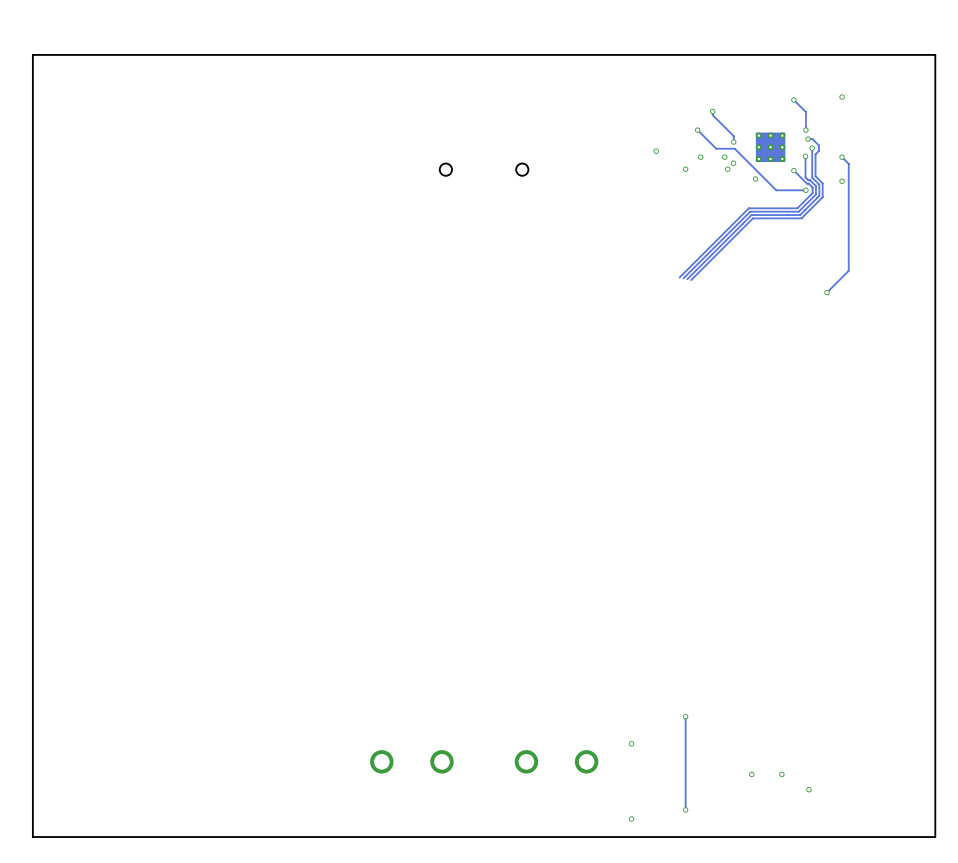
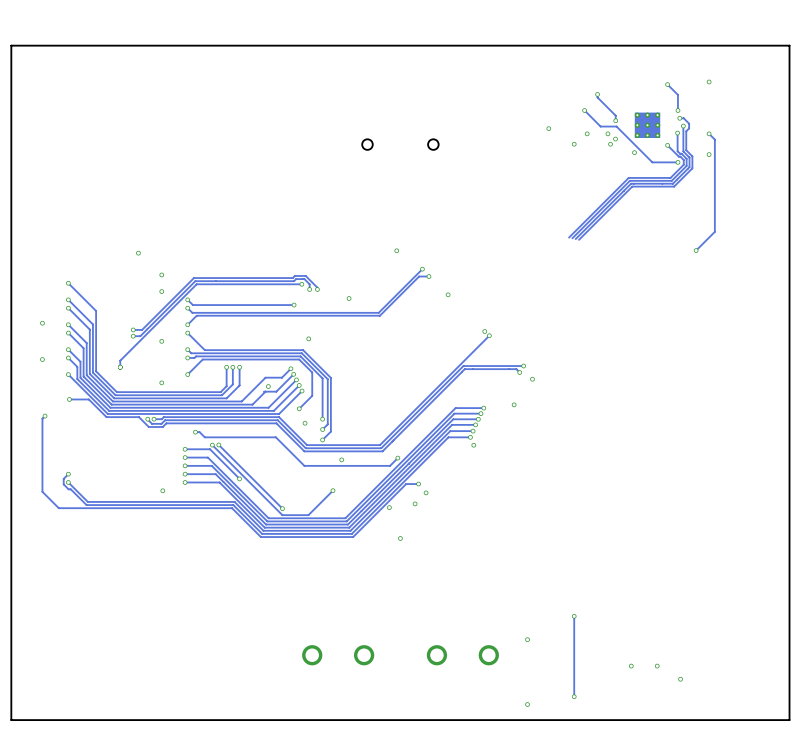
via: none -> (396, 250)
via: none -> (138, 253)
track: none -> (422, 269) (378, 312) (192, 312) (187, 308)
via: none -> (422, 269)
via: none -> (161, 274)
track: none -> (428, 276) (419, 276) (379, 315) (196, 315) (187, 324)
via: none -> (428, 276)
track: none -> (68, 283) (96, 310) (96, 371) (116, 392) (220, 392) (226, 386) (226, 367)
via: none -> (68, 283)
track: none -> (301, 284) (196, 284) (120, 360) (120, 367)
via: none -> (301, 284)
track: none -> (309, 289) (309, 284) (304, 279) (296, 279) (294, 281) (195, 281) (140, 336) (133, 336)
via: none -> (309, 289)
track: none -> (317, 289) (305, 275) (294, 275) (292, 278) (193, 278) (142, 329) (133, 329)
via: none -> (317, 289)
via: none -> (161, 291)
via: none -> (448, 294)
via: none -> (349, 298)
track: none -> (68, 299) (92, 324) (92, 372) (115, 395) (222, 395) (232, 384) (232, 367)
via: none -> (68, 299)
track: none -> (187, 299) (192, 305) (294, 305)
via: none -> (187, 299)
via: none -> (294, 305)
track: none -> (68, 308) (89, 329) (89, 373) (114, 398) (226, 398) (239, 385) (239, 367)
via: none -> (68, 308)
via: none -> (187, 308)
via: none -> (42, 323)
track: none -> (68, 324) (86, 343) (86, 375) (113, 401) (241, 401) (265, 377) (281, 377) (290, 368)
via: none -> (68, 324)
via: none -> (187, 324)
via: none -> (133, 329)
via: none -> (484, 331)
track: none -> (68, 333) (83, 348) (83, 376) (111, 404) (252, 404) (265, 391)
via: none -> (68, 333)
track: none -> (187, 333) (204, 350) (303, 350) (330, 377) (330, 431) (322, 439)
via: none -> (187, 333)
via: none -> (133, 336)
track: none -> (489, 335) (379, 445) (307, 445) (279, 417) (163, 417) (161, 419) (153, 419)
via: none -> (489, 335)
via: none -> (308, 338)
via: none -> (161, 341)
track: none -> (68, 349) (80, 361) (80, 377) (110, 407) (268, 407) (296, 379)
via: none -> (68, 349)
track: none -> (187, 349) (191, 353) (301, 353) (327, 379) (327, 424) (322, 429)
via: none -> (187, 349)
track: none -> (68, 357) (77, 366) (77, 379) (109, 410) (273, 410) (299, 385)
via: none -> (68, 357)
track: none -> (187, 357) (300, 356) (322, 378) (322, 419)
via: none -> (187, 357)
via: none -> (42, 359)
track: none -> (523, 366) (463, 366) (381, 448) (305, 448) (277, 420) (165, 420) (161, 423) (152, 423) (147, 419)
via: none -> (523, 366)
via: none -> (120, 367)
via: none -> (226, 367)
via: none -> (232, 367)
via: none -> (239, 367)
via: none -> (290, 368)
track: none -> (519, 372) (516, 369) (464, 369) (382, 451) (304, 451) (276, 423) (166, 423) (162, 426) (148, 426) (138, 417) (106, 417) (88, 399) (69, 399)
via: none -> (519, 372)
track: none -> (68, 374) (107, 414) (279, 414) (302, 391)
via: none -> (68, 374)
track: none -> (187, 374) (202, 359) (299, 359) (312, 372) (312, 395) (299, 408)
via: none -> (187, 374)
track: none -> (293, 374) (276, 391) (263, 391)
via: none -> (293, 374)
via: none -> (532, 379)
via: none -> (296, 379)
via: none -> (161, 382)
via: none -> (299, 385)
via: none -> (268, 386)
via: none -> (302, 391)
via: none -> (69, 399)
via: none -> (514, 404)
track: none -> (483, 408) (455, 408) (345, 518) (268, 518) (207, 457) (185, 457)
via: none -> (483, 408)
via: none -> (299, 408)
track: none -> (480, 413) (454, 413) (346, 521) (267, 521) (211, 465) (185, 465)
via: none -> (480, 413)
track: none -> (45, 416) (42, 418) (42, 491) (58, 508) (232, 508) (260, 537) (353, 537) (406, 484) (418, 484)
via: none -> (45, 416)
via: none -> (147, 419)
via: none -> (153, 419)
via: none -> (322, 419)
track: none -> (478, 419) (453, 419) (348, 524) (266, 524) (215, 474) (185, 474)
via: none -> (478, 419)
via: none -> (305, 423)
track: none -> (475, 424) (452, 424) (349, 527) (264, 527) (219, 482) (185, 482)
via: none -> (475, 424)
via: none -> (322, 429)
track: none -> (473, 431) (450, 431) (350, 530) (263, 530) (234, 501) (87, 501) (68, 482)
via: none -> (473, 431)
track: none -> (195, 432) (199, 432) (204, 437) (275, 437) (304, 465) (390, 465) (397, 458)
via: none -> (195, 432)
track: none -> (470, 437) (448, 437) (351, 533) (262, 533) (233, 505) (86, 505) (63, 484) (63, 478) (68, 474)
via: none -> (470, 437)
via: none -> (322, 439)
track: none -> (218, 444) (282, 508)
via: none -> (218, 444)
track: none -> (212, 445) (282, 515) (308, 515) (332, 490)
via: none -> (212, 445)
via: none -> (473, 445)
track: none -> (185, 449) (210, 449) (239, 478)
via: none -> (185, 449)
via: none -> (185, 457)
via: none -> (397, 458)
via: none -> (341, 459)
via: none -> (185, 465)
via: none -> (68, 474)
via: none -> (185, 474)
via: none -> (239, 478)
via: none -> (68, 482)
via: none -> (185, 482)
via: none -> (418, 484)
via: none -> (332, 490)
via: none -> (162, 490)
via: none -> (426, 492)
via: none -> (415, 503)
via: none -> (389, 507)
via: none -> (282, 508)
via: none -> (400, 538)

